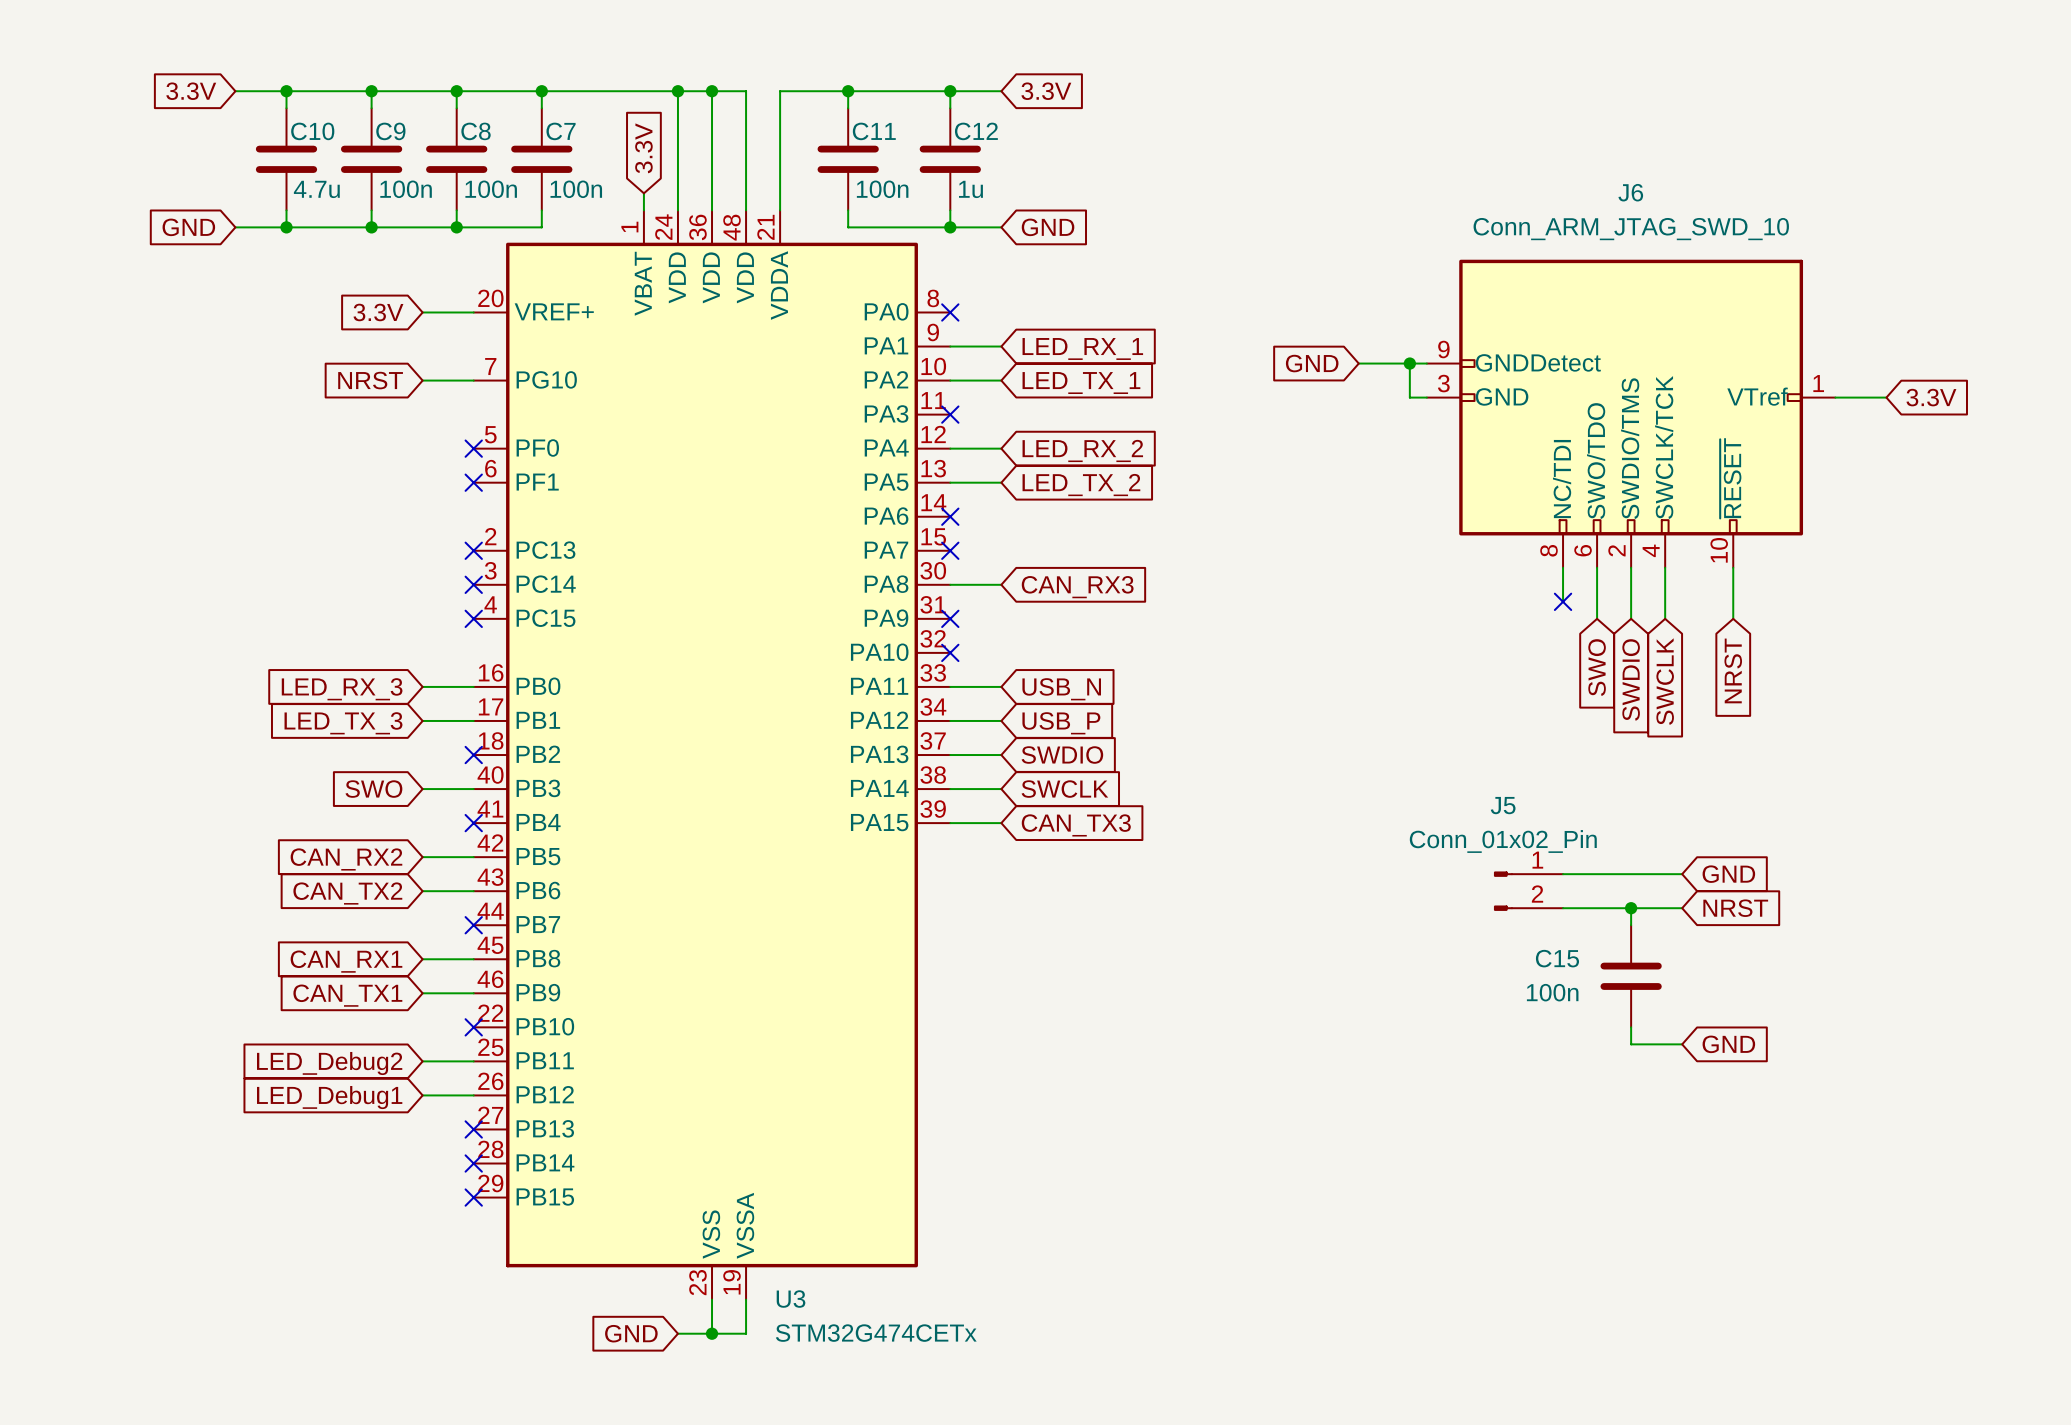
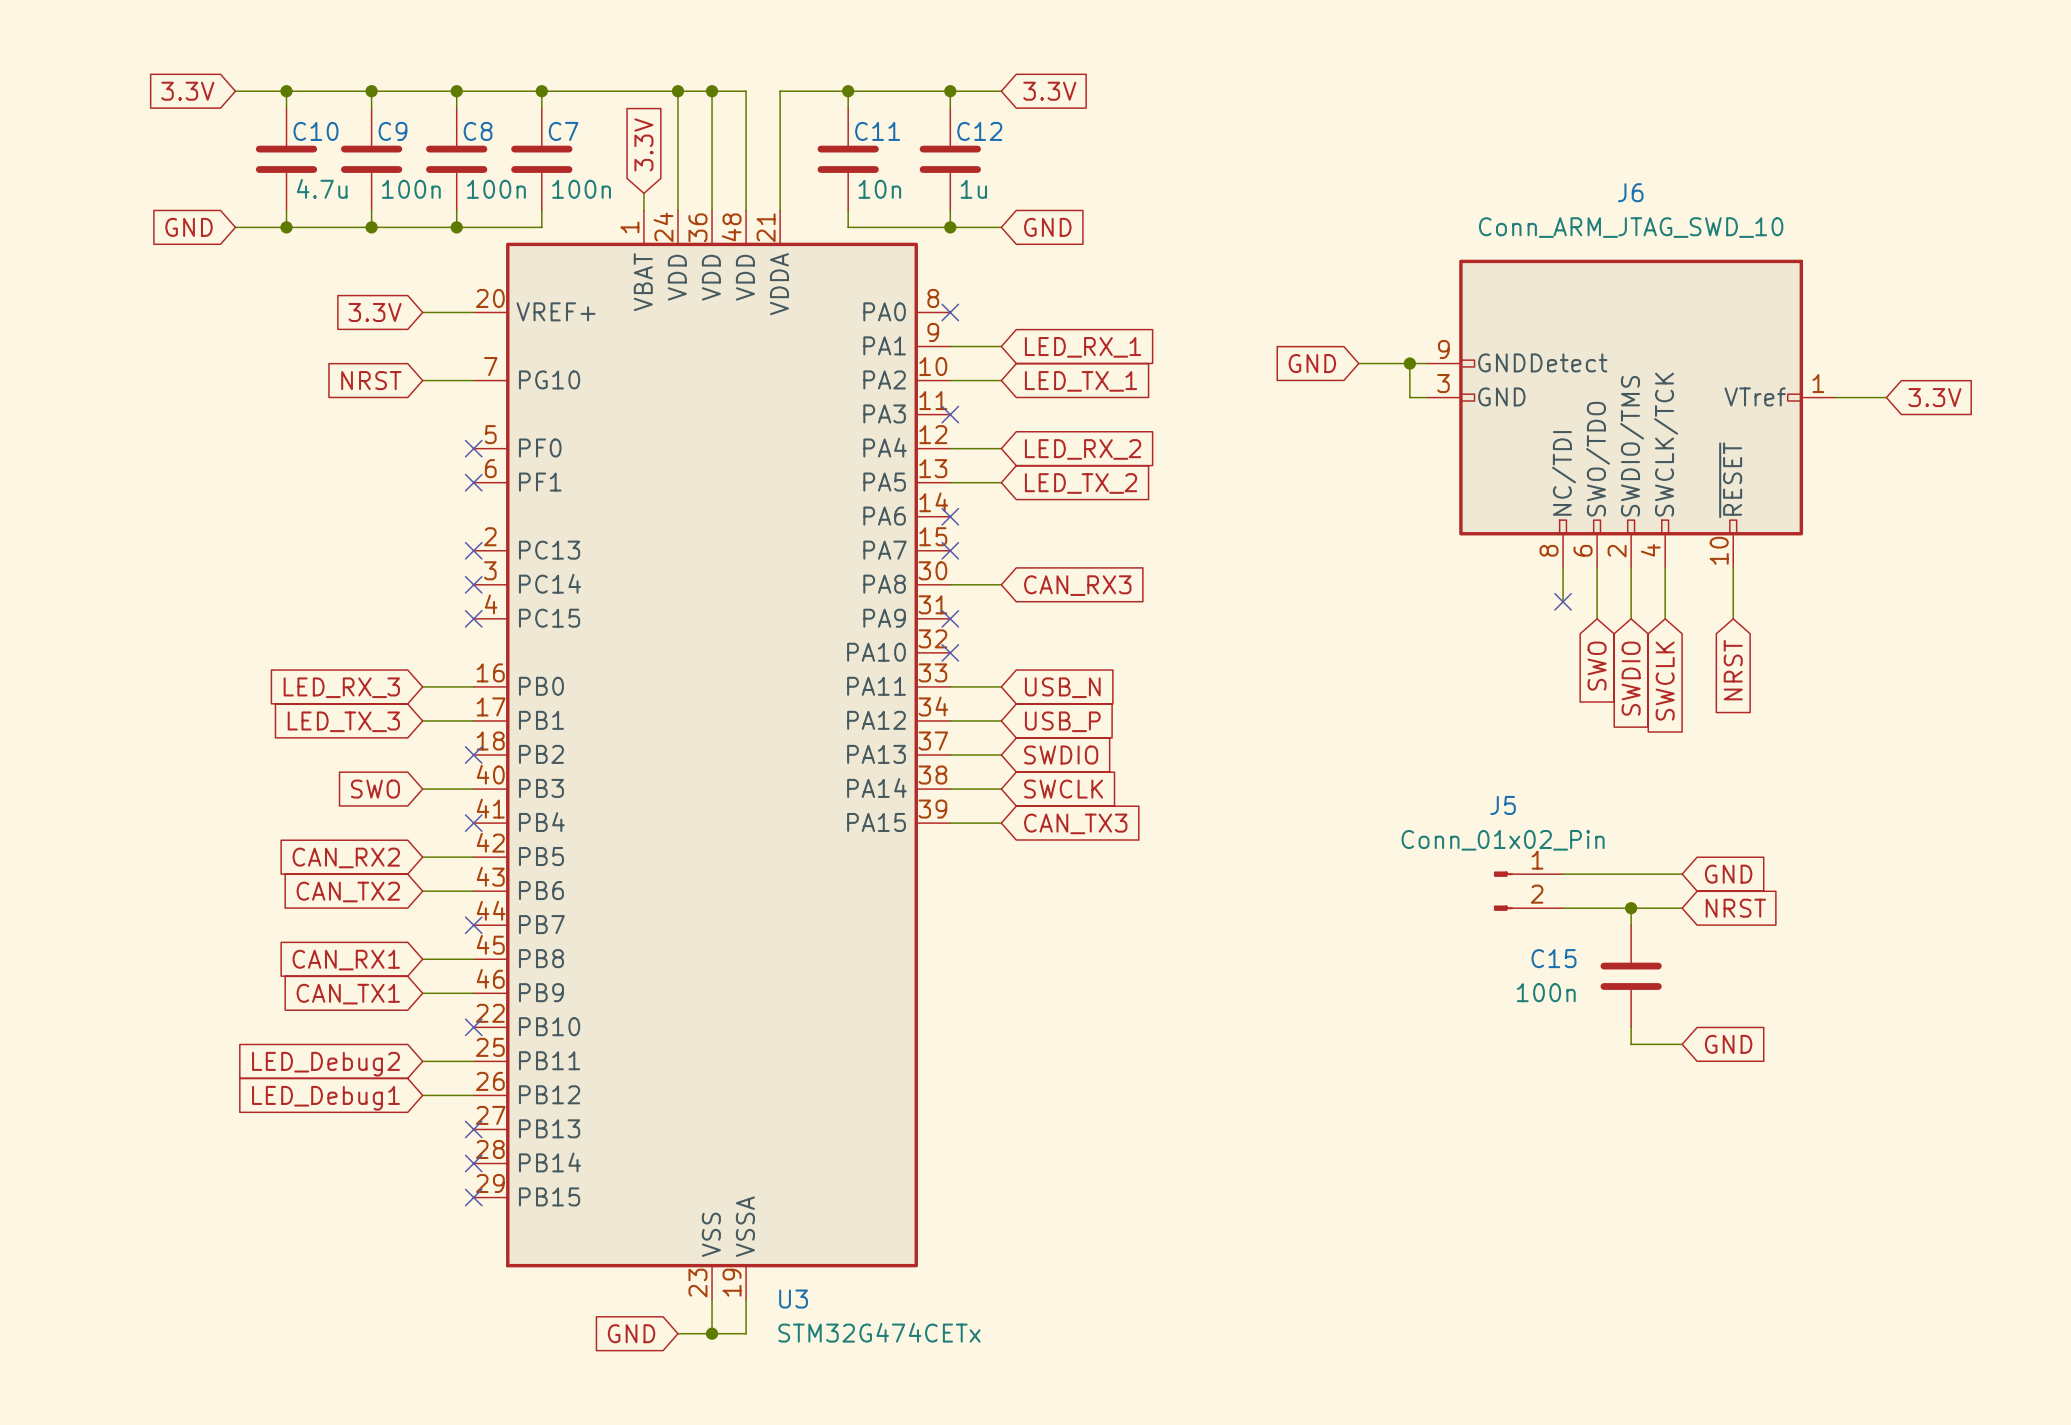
C11 value: 100n (882, 189) -> 10n (879, 189)

